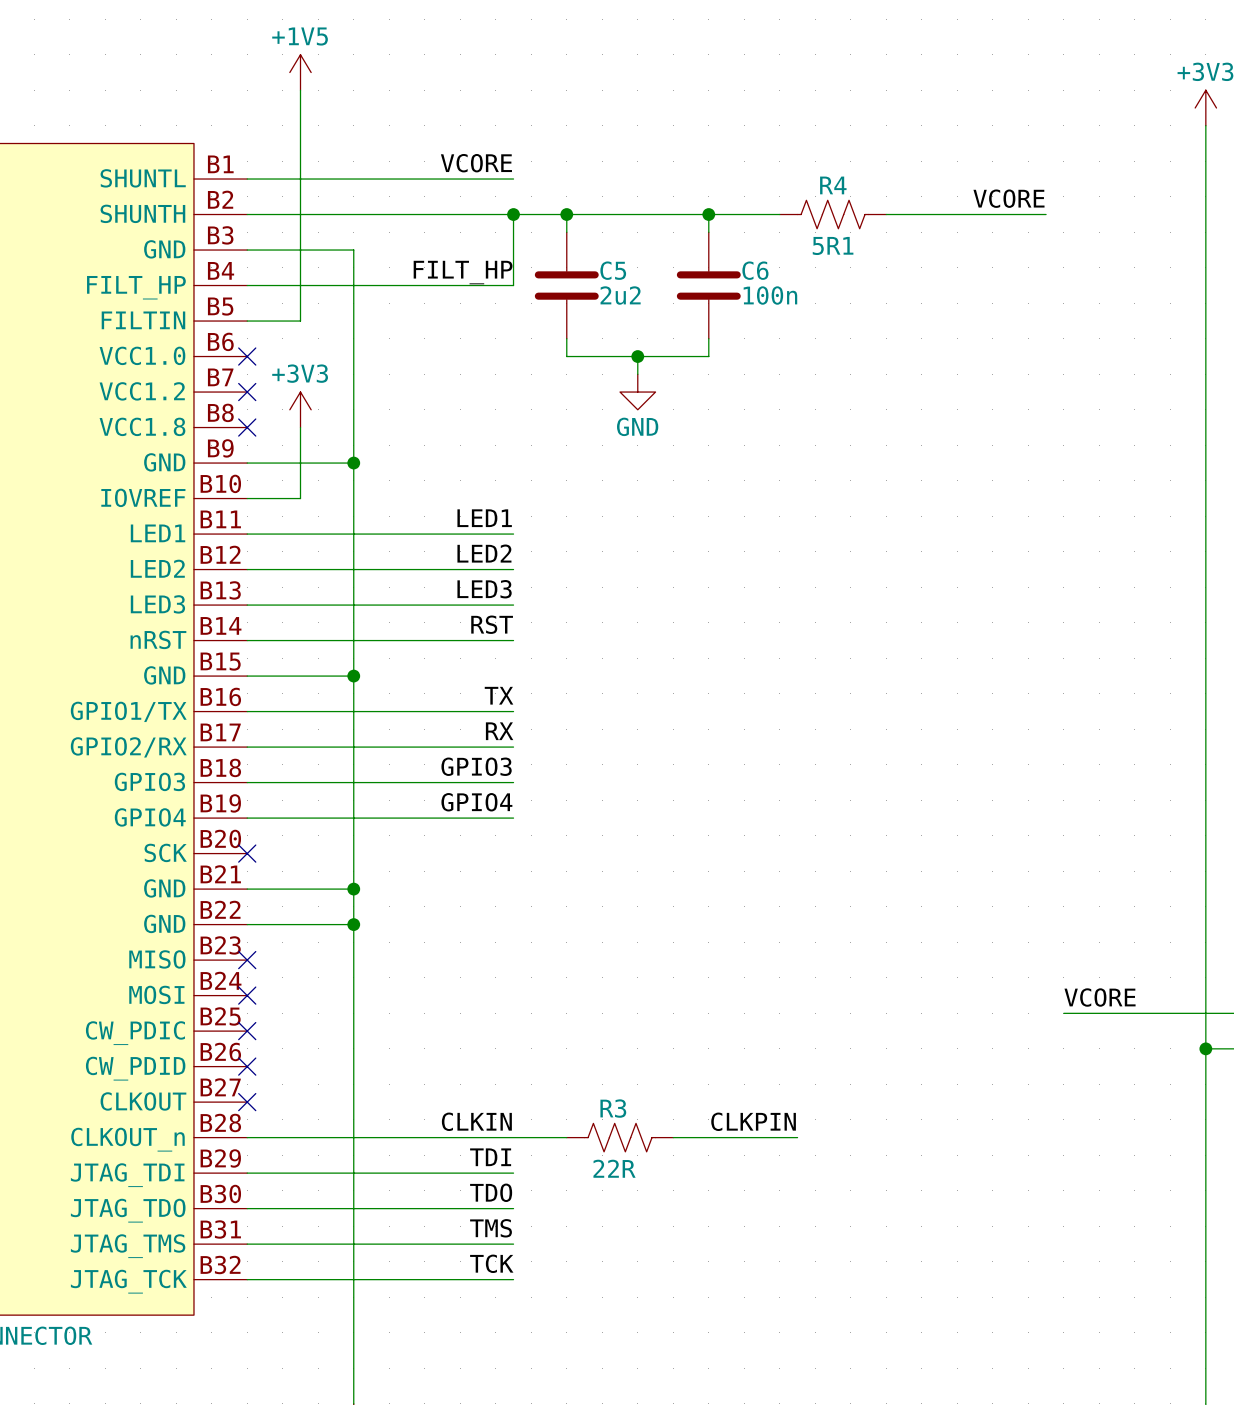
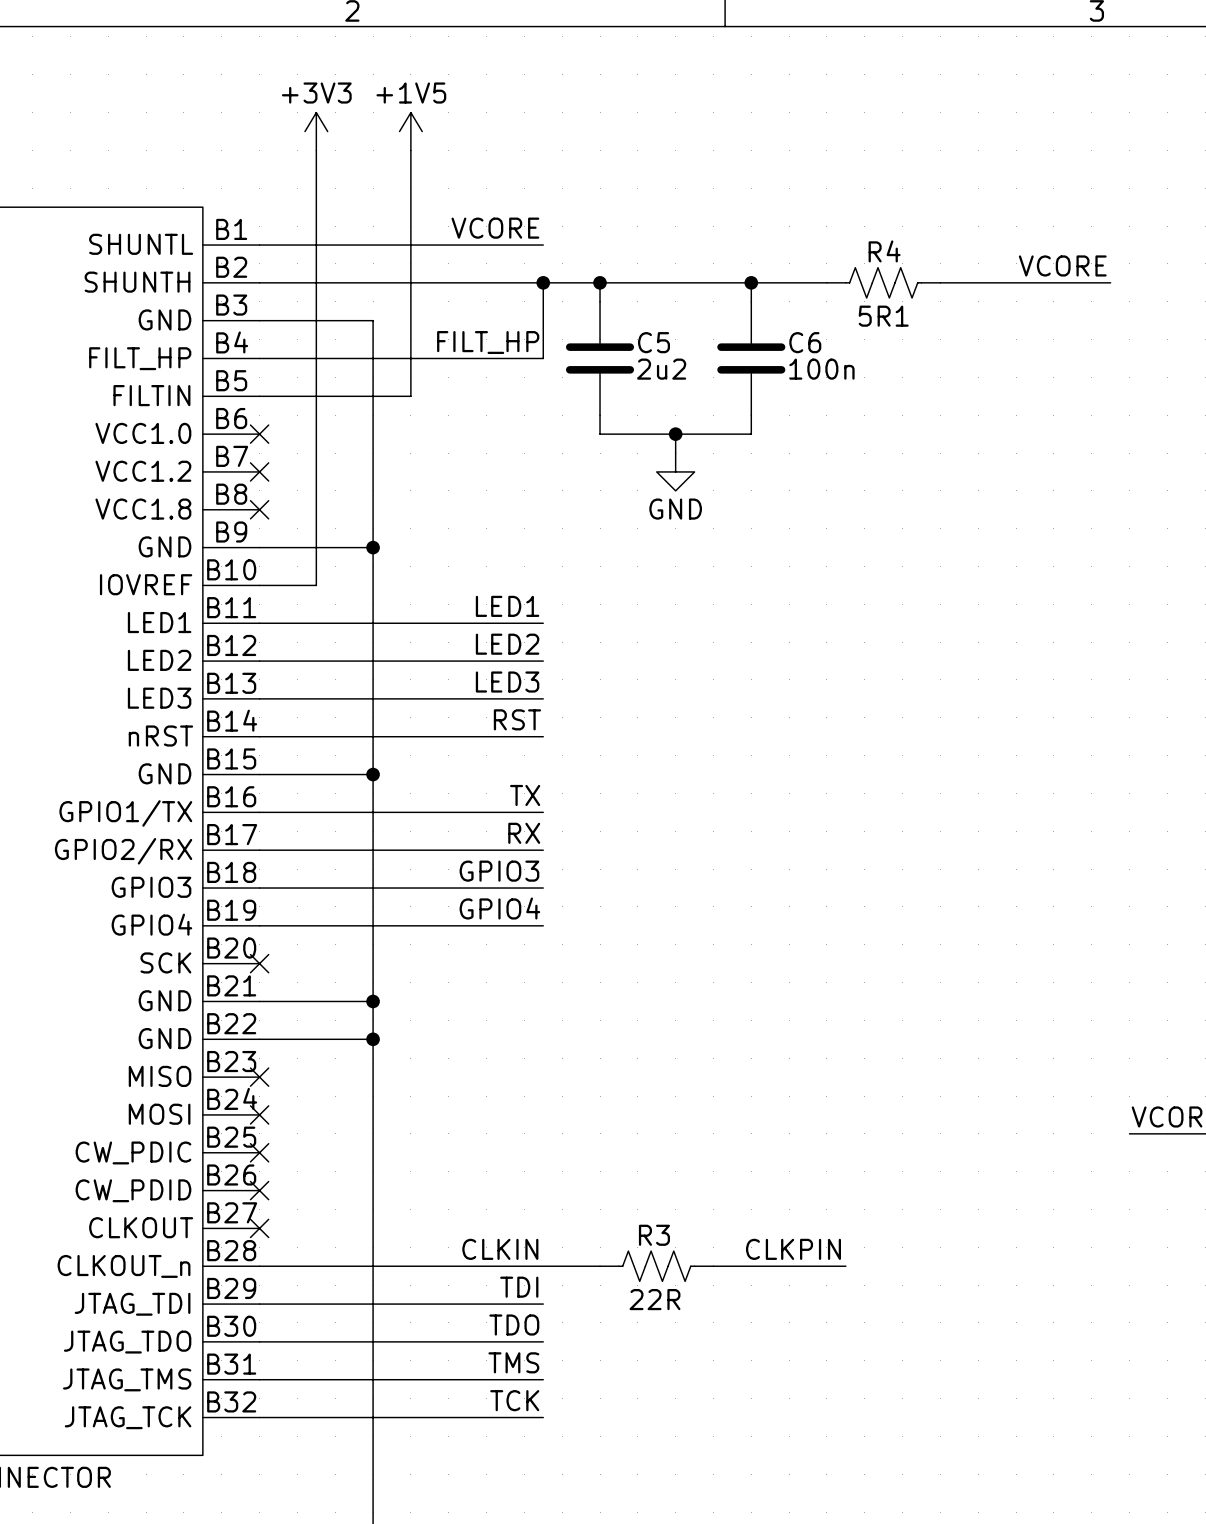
power symbol: +1V5 (300, 72) -> +3V3 (316, 131)
power symbol: none -> +1V5 (410, 131)
wire: none -> (410, 150) (410, 396) (316, 396) (316, 509)
power symbol: +3V3 (300, 409) -> none

